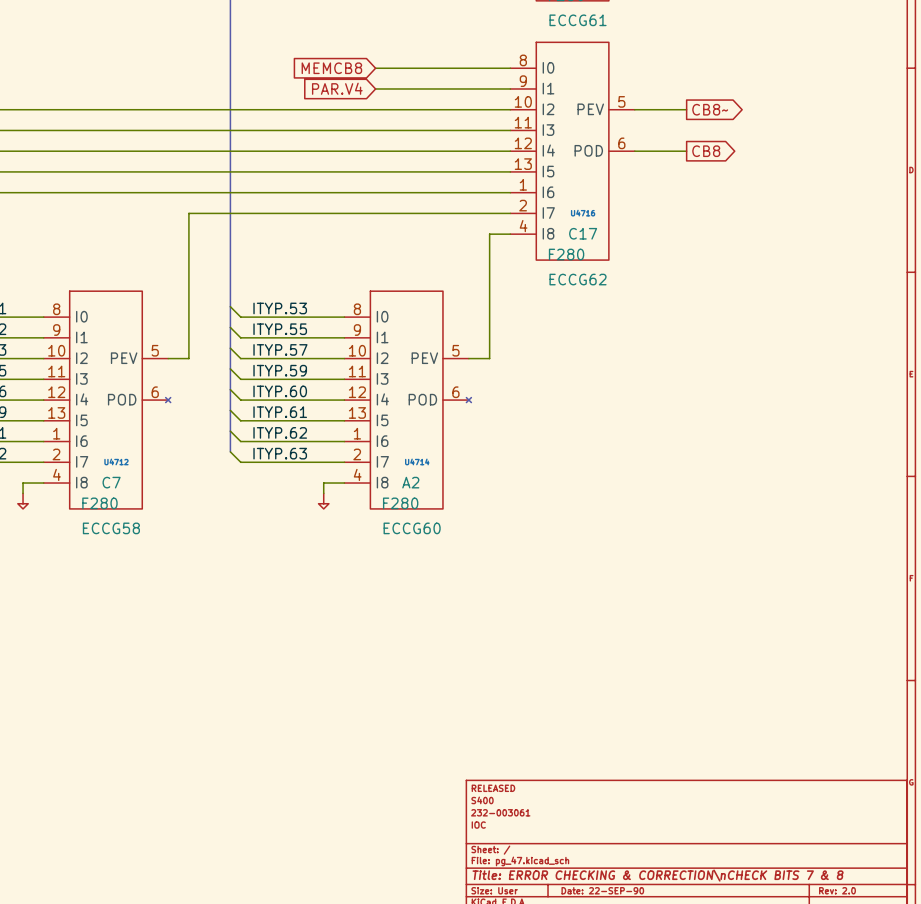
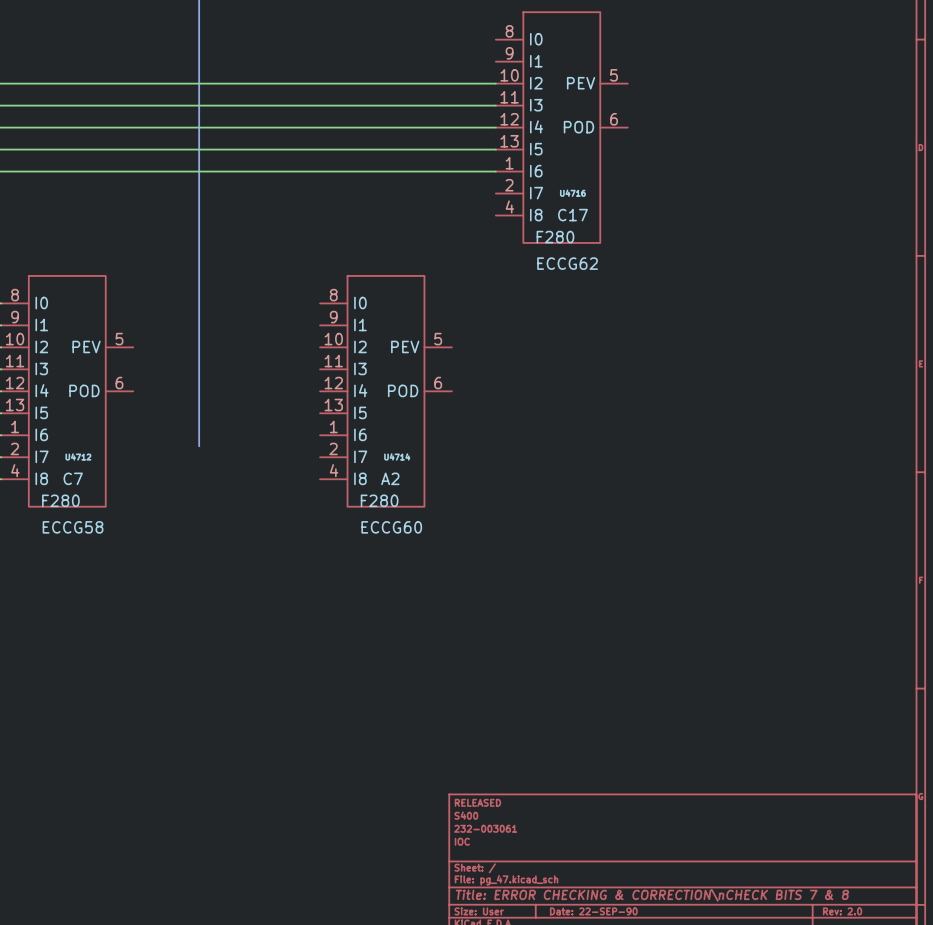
global label: MEMCB8 (331, 68) -> none
wire: (375, 68) (510, 68) -> none
global label: PAR.V4 (337, 88) -> none
wire: (375, 88) (510, 88) -> none
wire: (634, 109) (686, 109) -> none
global label: CB8~ (710, 109) -> none
wire: (634, 151) (686, 151) -> none
global label: CB8 (706, 151) -> none
wire: (510, 213) (188, 213) (188, 358) (168, 358) -> none
wire: (510, 234) (489, 234) (489, 358) (468, 358) -> none
wire: (230, 306) (240, 317) (344, 317) -> none
label: ITYP.53 (280, 308) -> none
wire: (230, 327) (240, 337) (344, 337) -> none
label: ITYP.55 (280, 329) -> none
wire: (230, 348) (240, 358) (344, 358) -> none
label: ITYP.57 (280, 349) -> none
wire: (230, 368) (240, 379) (344, 379) -> none
label: ITYP.59 (280, 370) -> none
wire: (230, 389) (240, 400) (344, 400) -> none
label: ITYP.60 (280, 391) -> none
no-connect mark: (168, 400) -> none
no-connect mark: (468, 400) -> none
wire: (230, 410) (240, 420) (344, 420) -> none
label: ITYP.61 (280, 412) -> none
wire: (230, 431) (240, 441) (344, 441) -> none
label: ITYP.62 (280, 432) -> none
wire: (230, 451) (240, 462) (344, 462) -> none
label: ITYP.63 (280, 453) -> none
wire: (344, 483) (323, 483) (323, 493) -> none
power symbol: (323, 501) -> none

